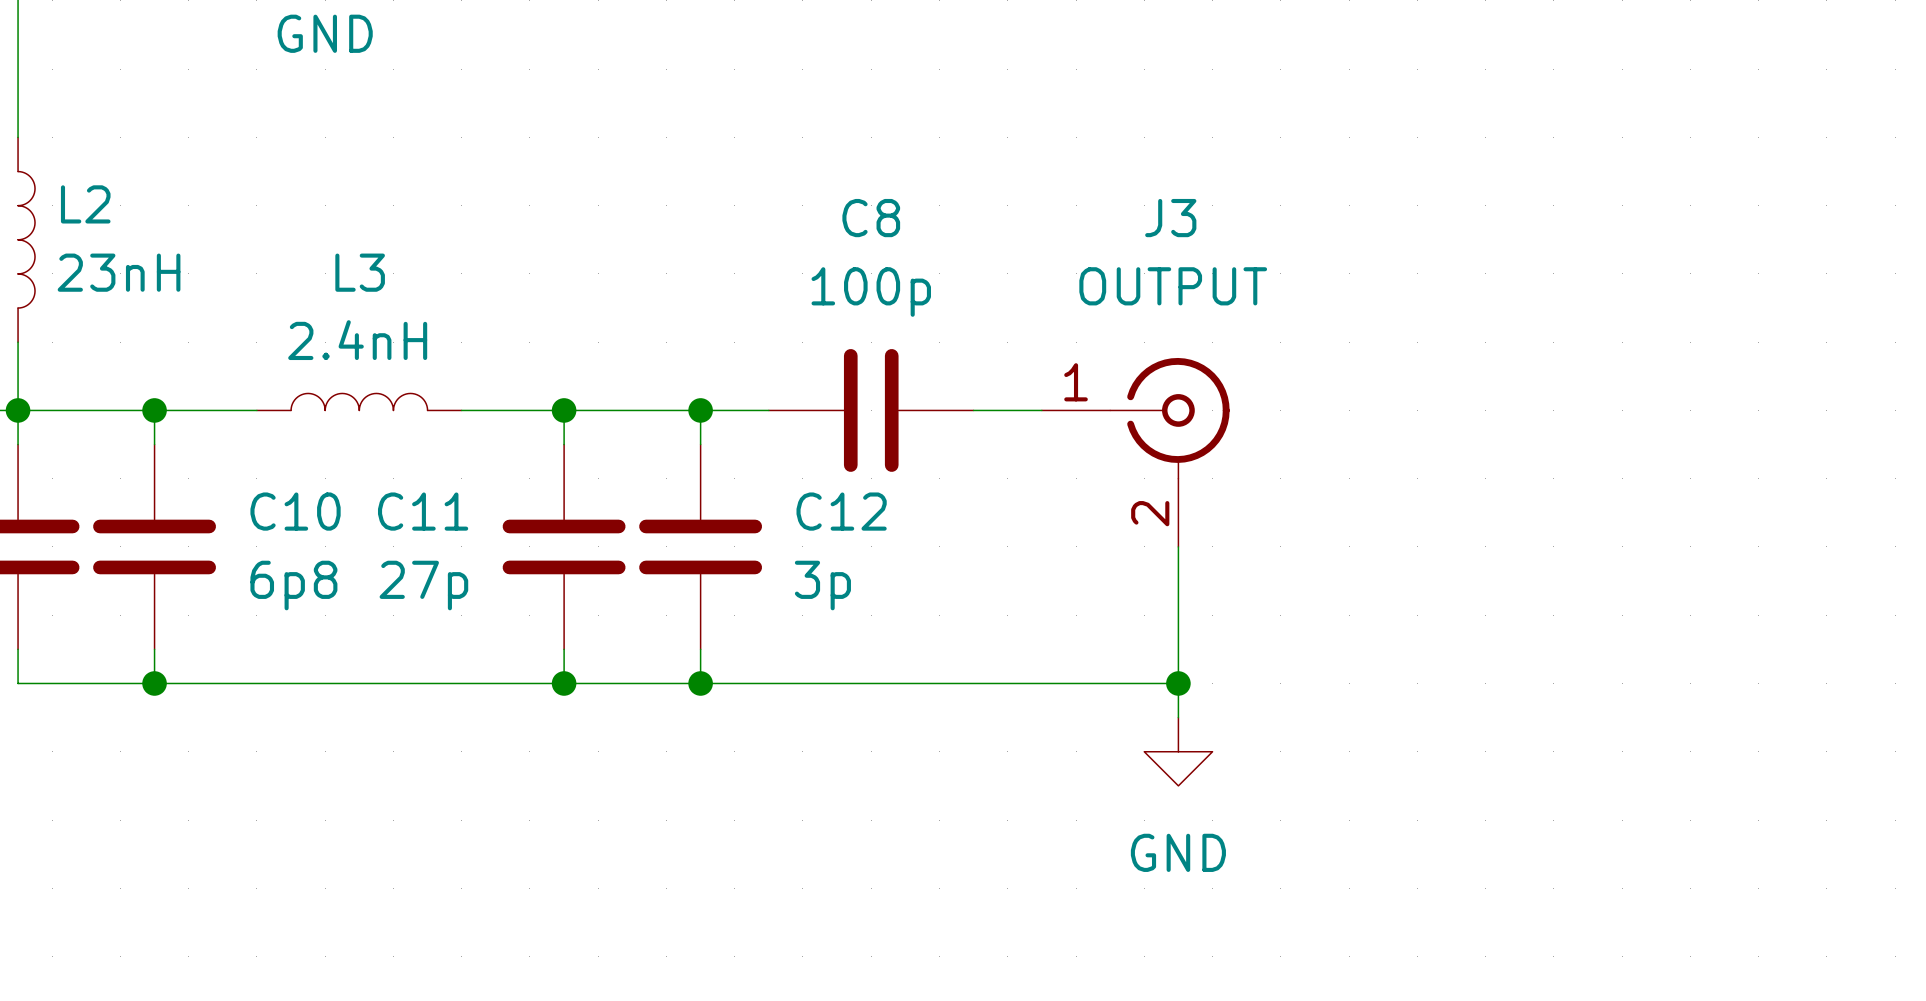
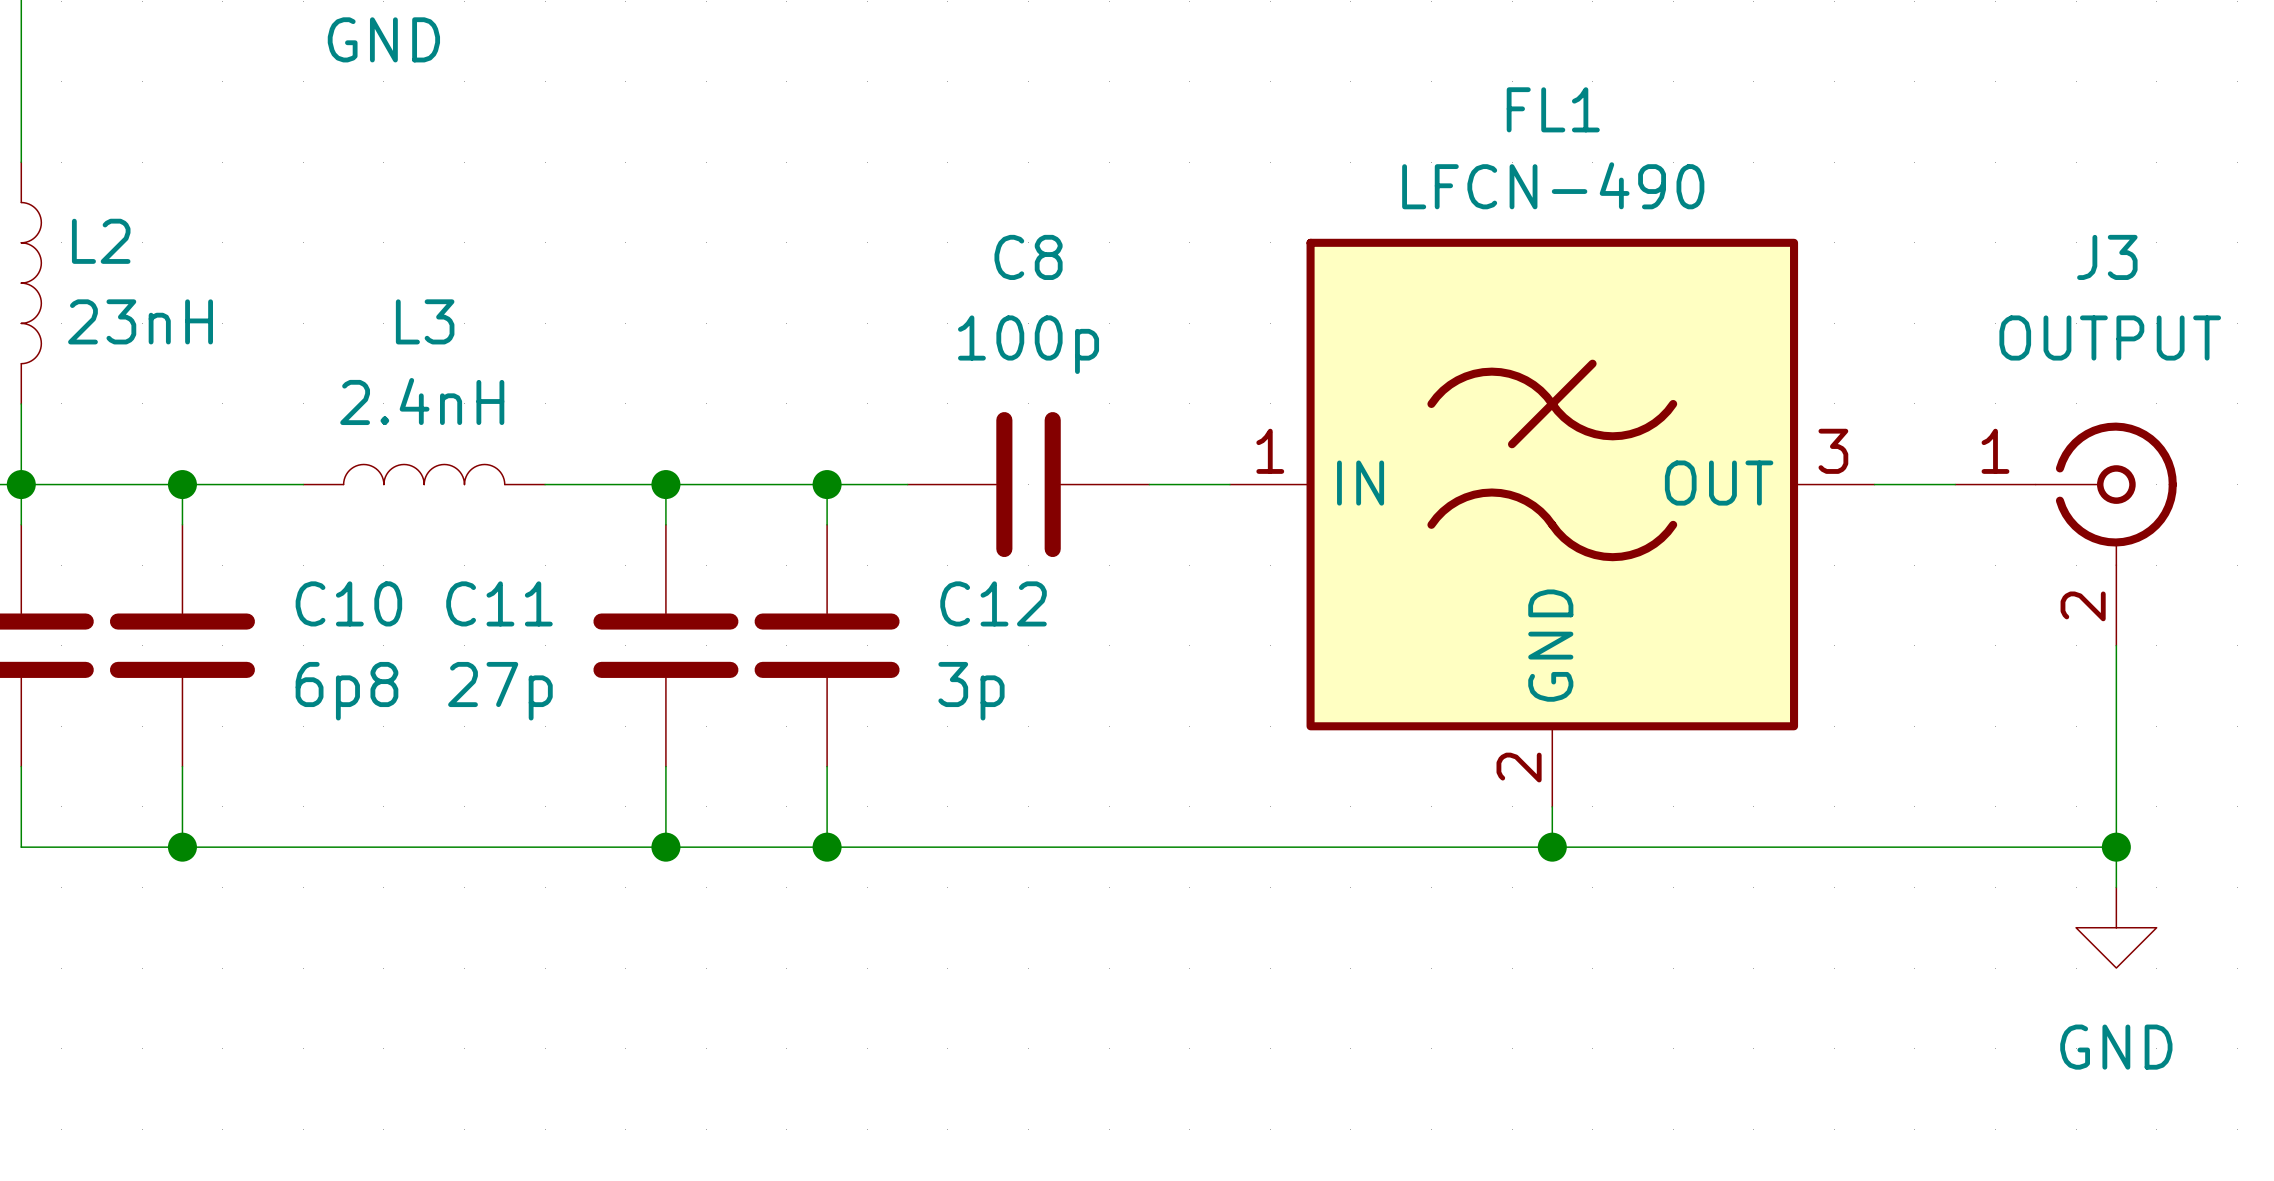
wire: none -> (1874, 484) (1955, 484)
FL1: none -> LFCN-490 (1552, 522)
J3 position: (1135, 452) -> (2065, 534)
wire: (1178, 546) (1178, 717) -> none
wire: none -> (2116, 645) (2116, 887)
wire: (18, 683) (1178, 683) -> (21, 806) (21, 847) (2116, 847)
wire: none -> (182, 806) (182, 847)
junction position: (154, 683) -> (182, 847)
wire: none -> (665, 806) (665, 847)
junction position: (564, 683) -> (665, 847)
wire: none -> (827, 806) (827, 847)
junction position: (700, 683) -> (827, 847)
junction position: (1178, 683) -> (1552, 847)
wire: none -> (1552, 806) (1552, 847)
junction: none -> (2116, 847)
power symbol position: GND (1178, 751) -> GND (2116, 927)

